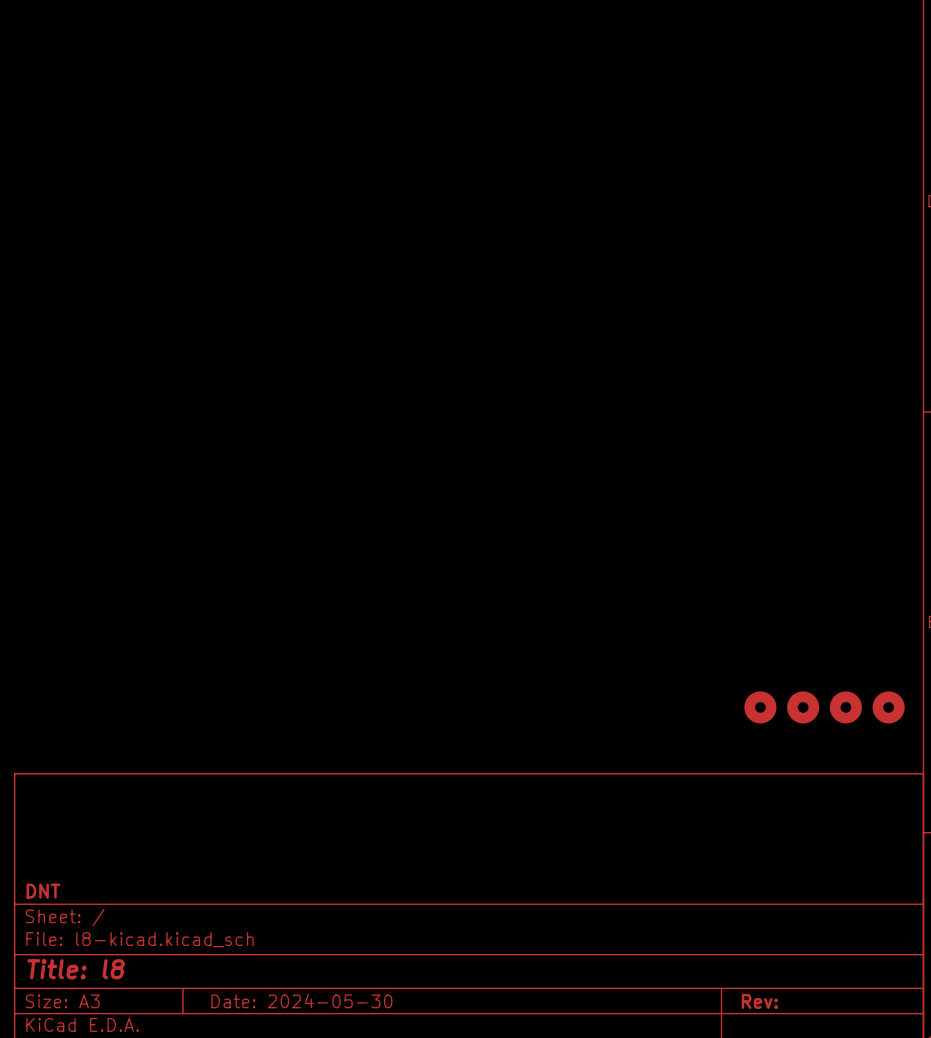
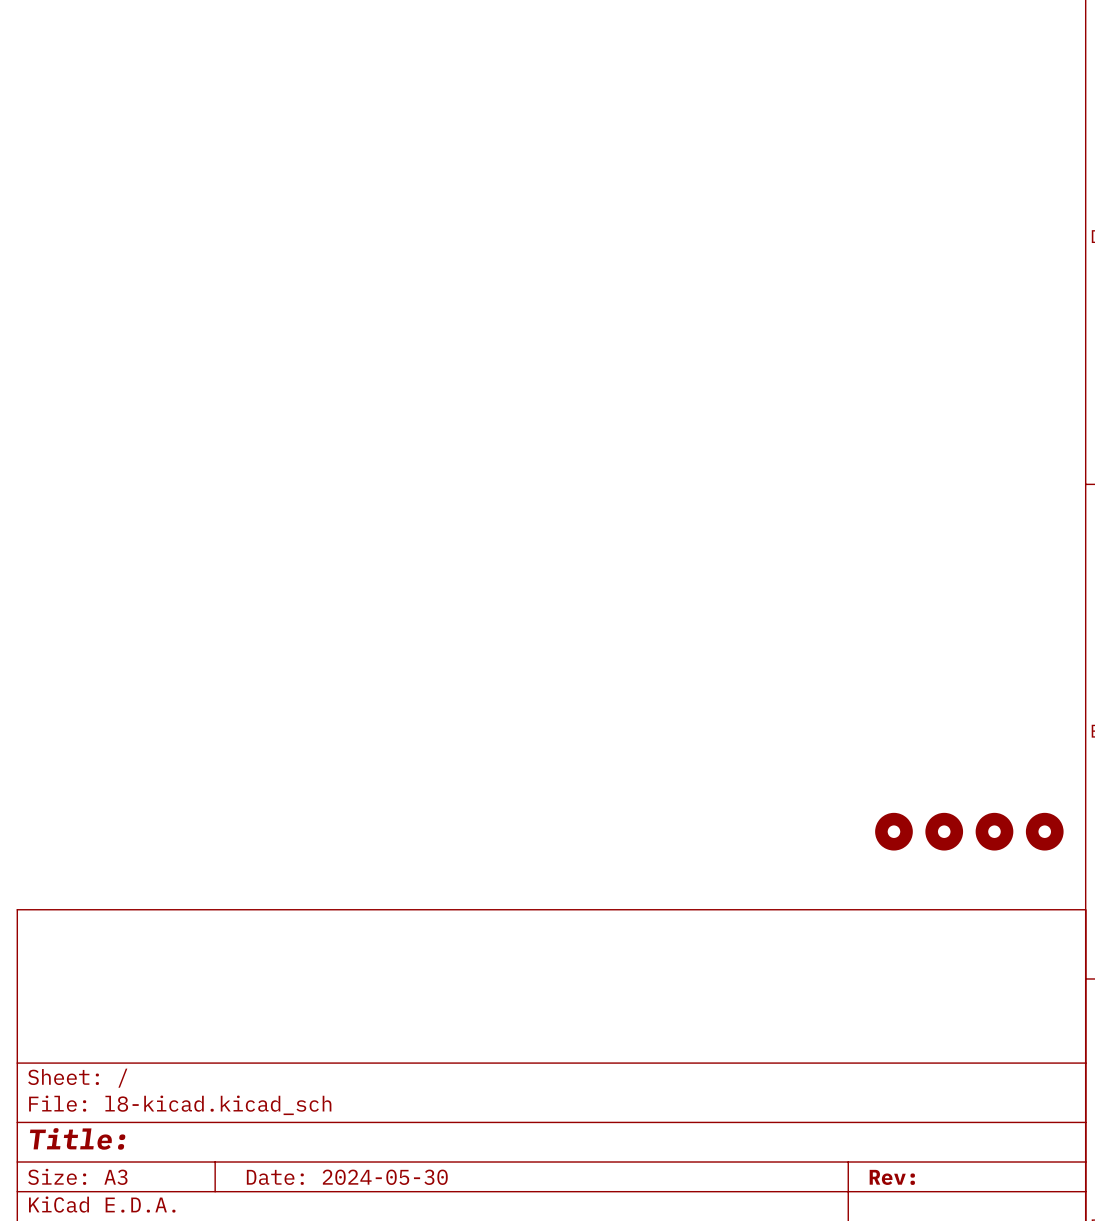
title block: DNT (43, 891) -> none
title block: Title: l8 (76, 969) -> Title: (77, 1138)

